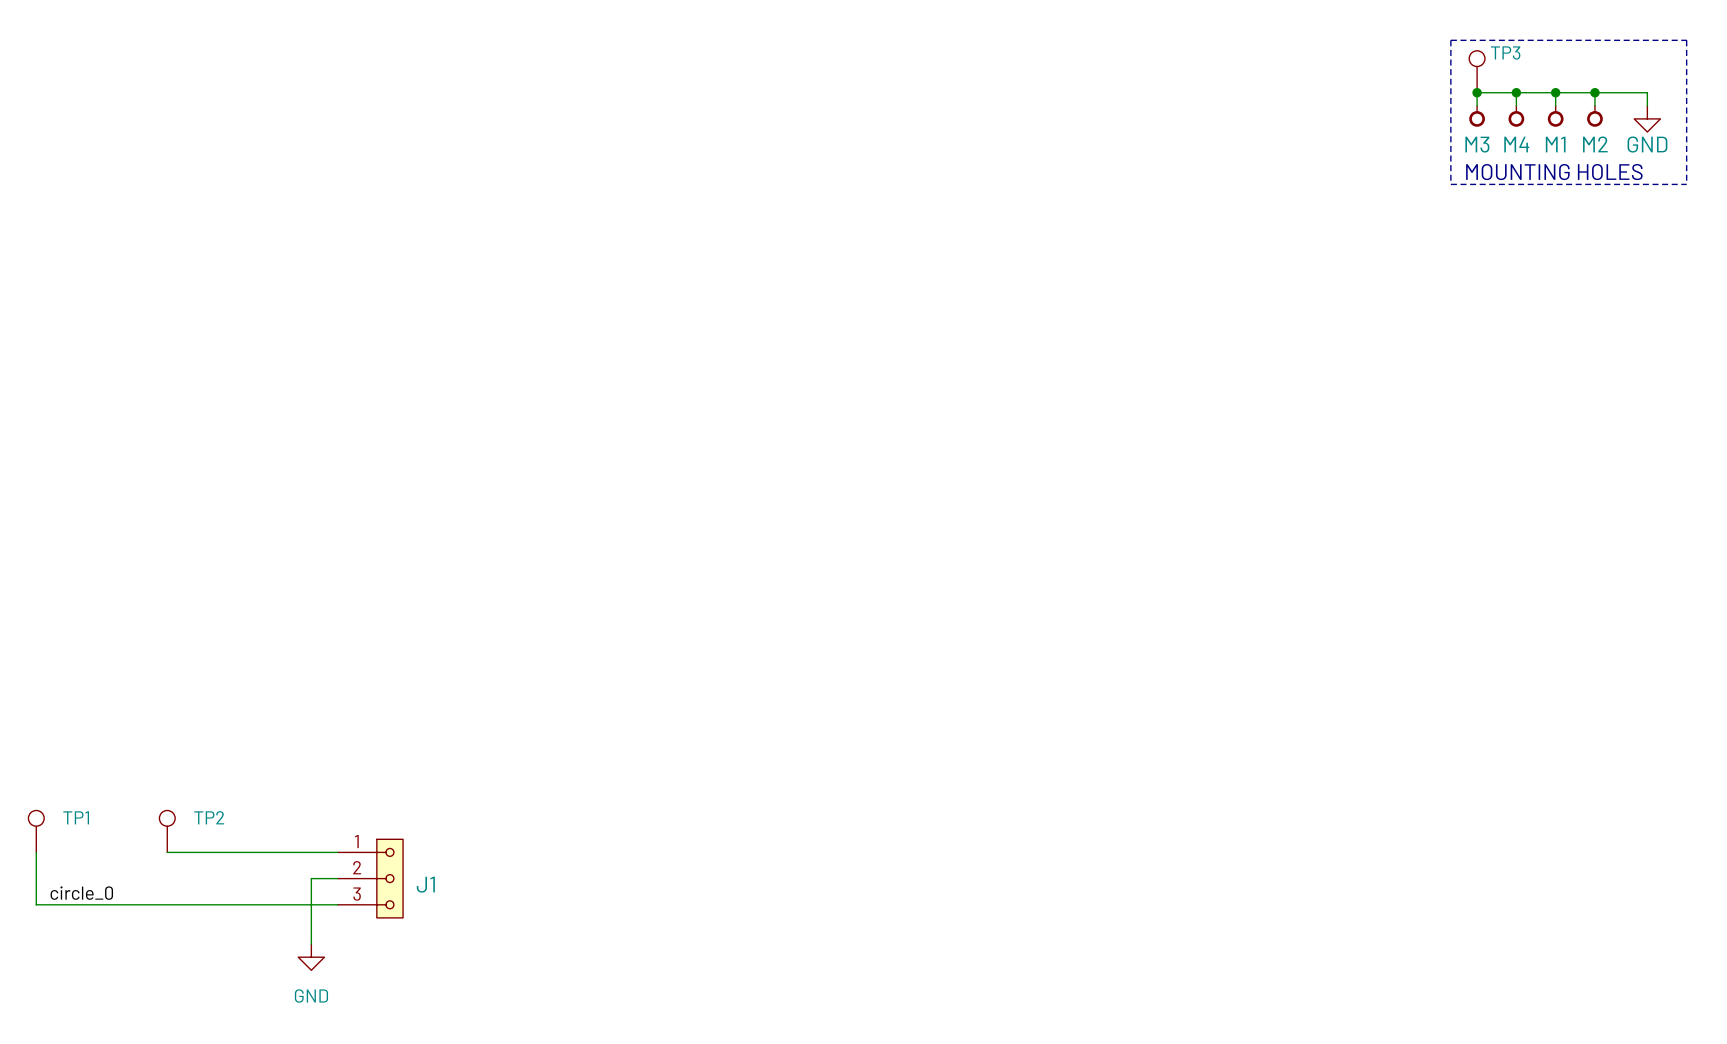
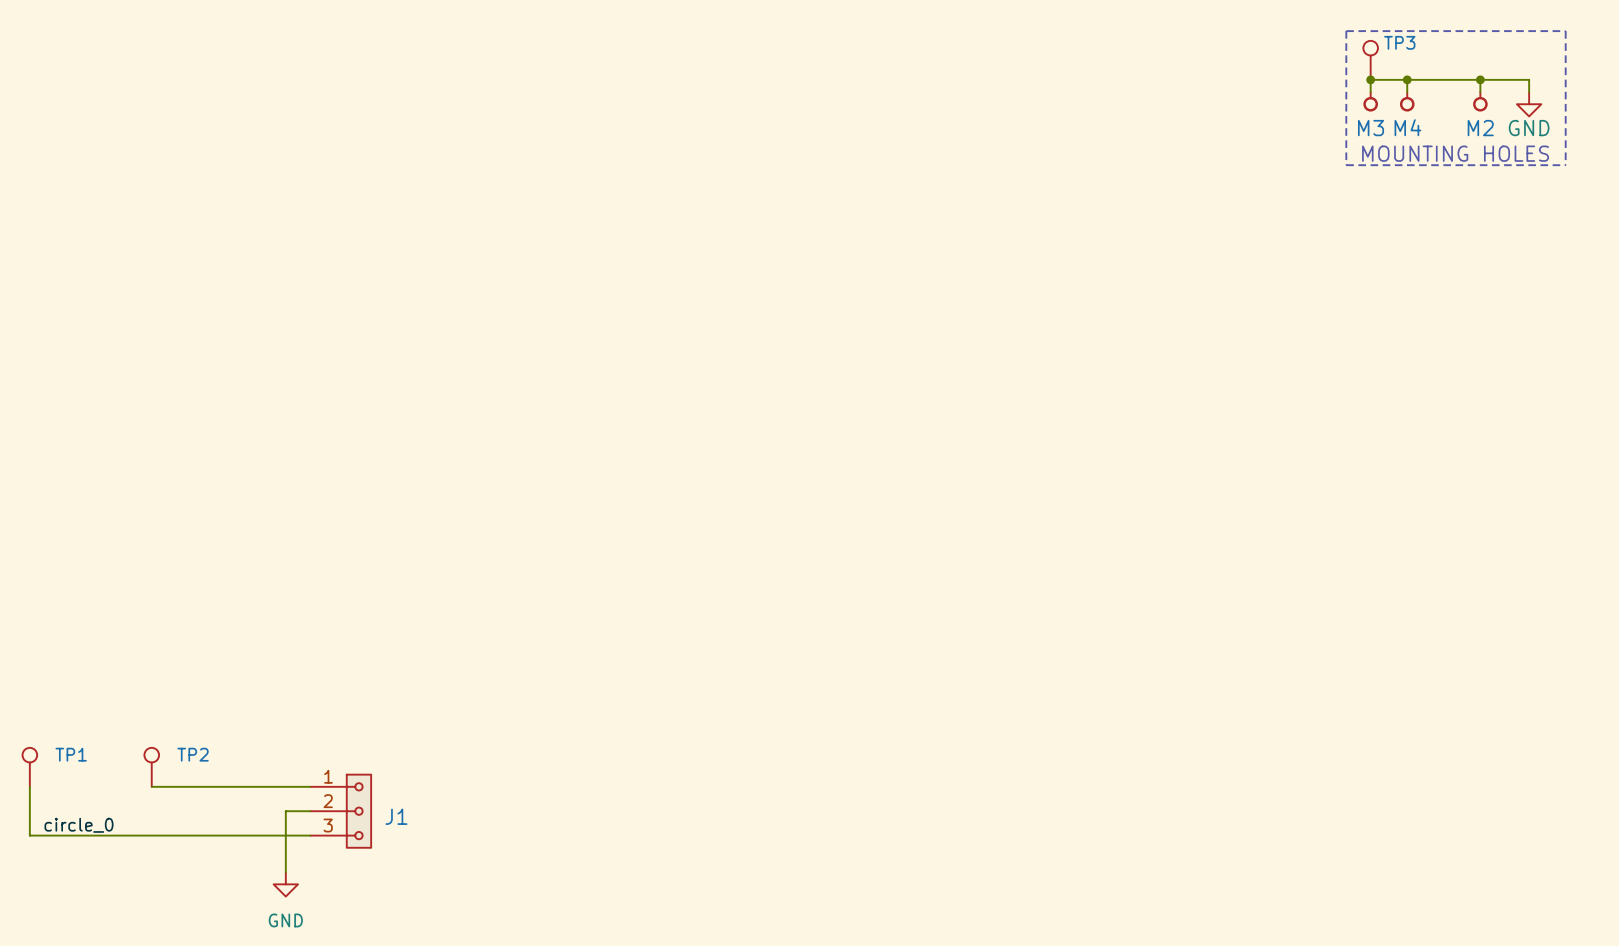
wire: (1555, 92) (1555, 105) -> none
junction: (1555, 92) -> none
M1: (1555, 116) -> none

